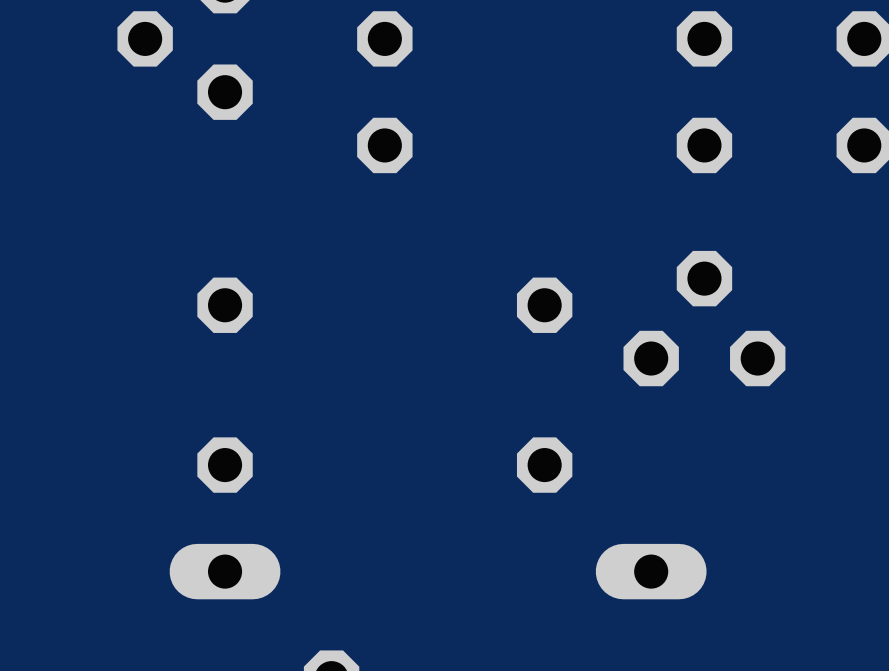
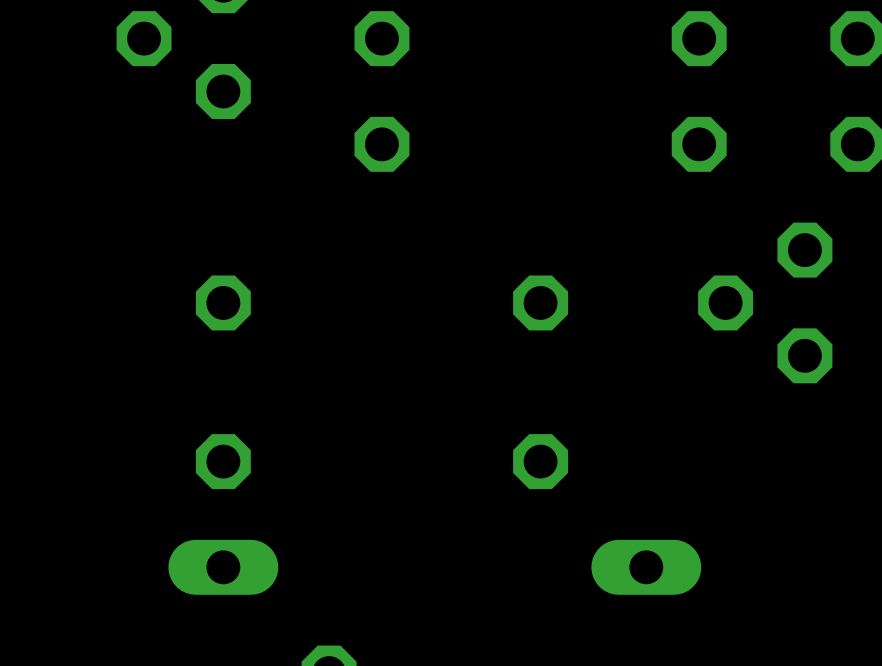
part rotation: 0° (704, 318) -> 90° counterclockwise (765, 302)

